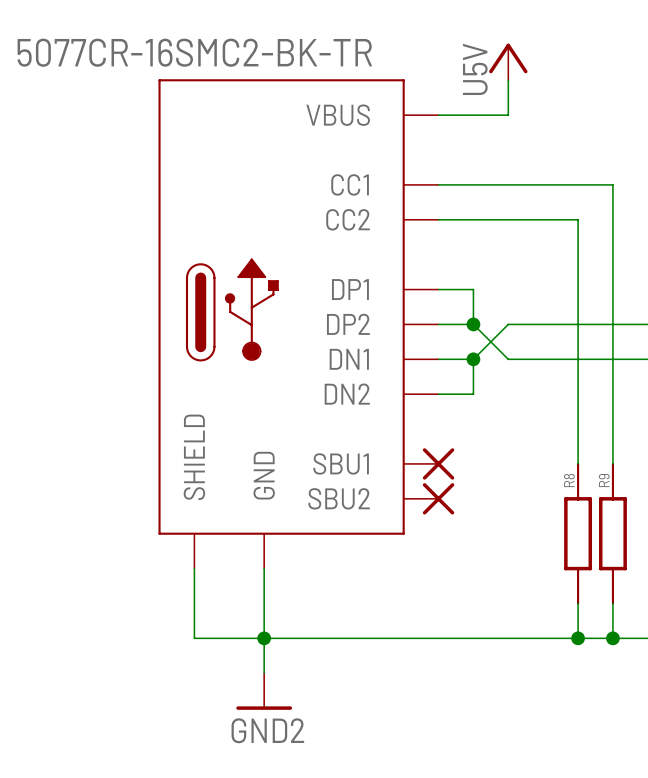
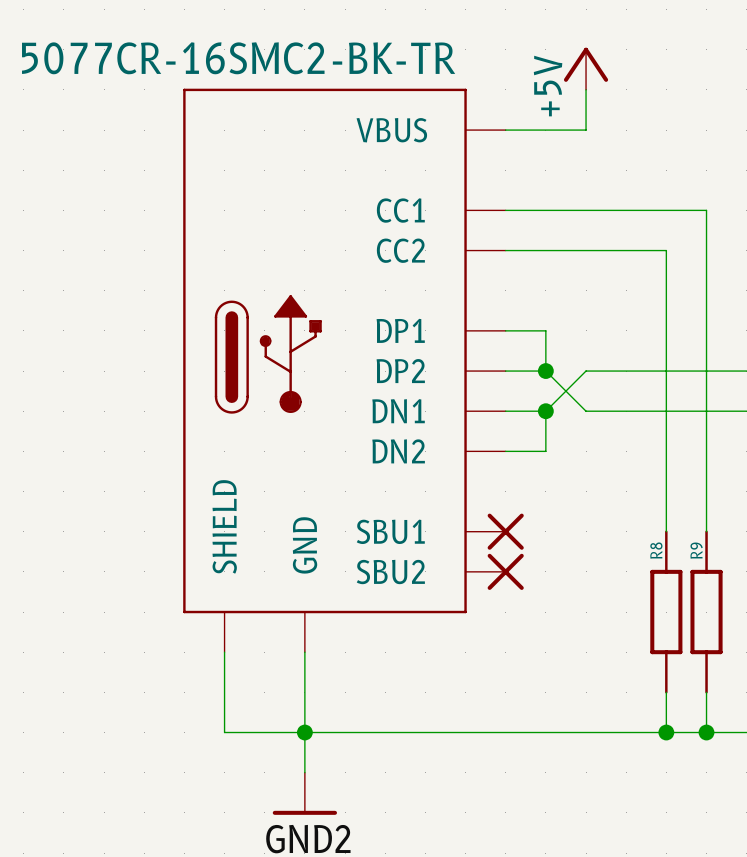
label: U5V (475, 69) -> none
power symbol text: none -> +5V (548, 86)

